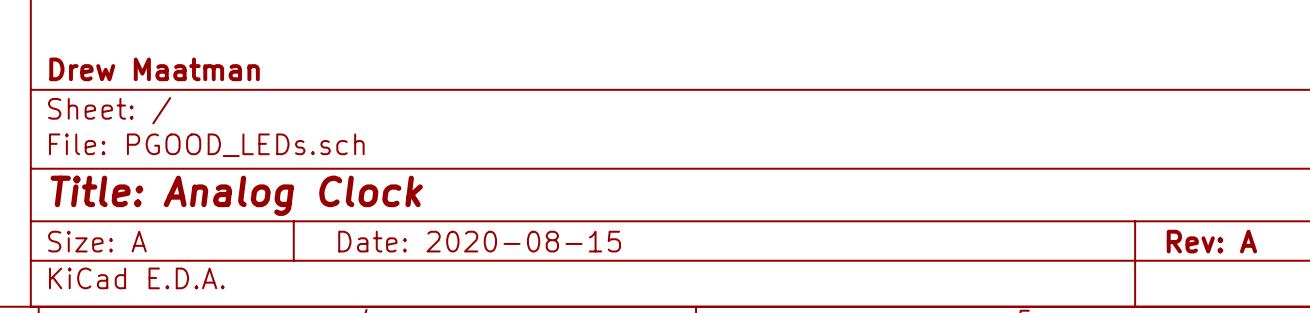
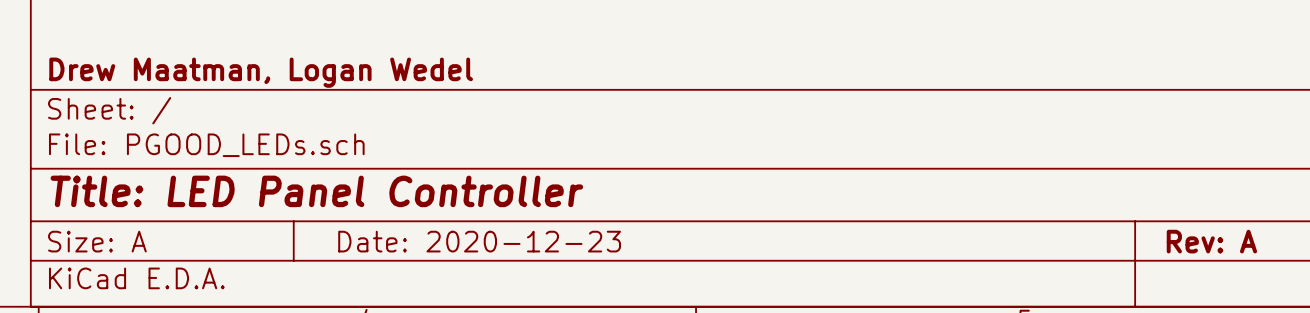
title block: Drew Maatman (154, 69) -> Drew Maatman, Logan Wedel (261, 72)
title block: Title: Analog Clock (236, 195) -> Title: LED Panel Controller (316, 191)
title block: Date: 2020-08-15 (479, 241) -> Date: 2020-12-23 (479, 241)

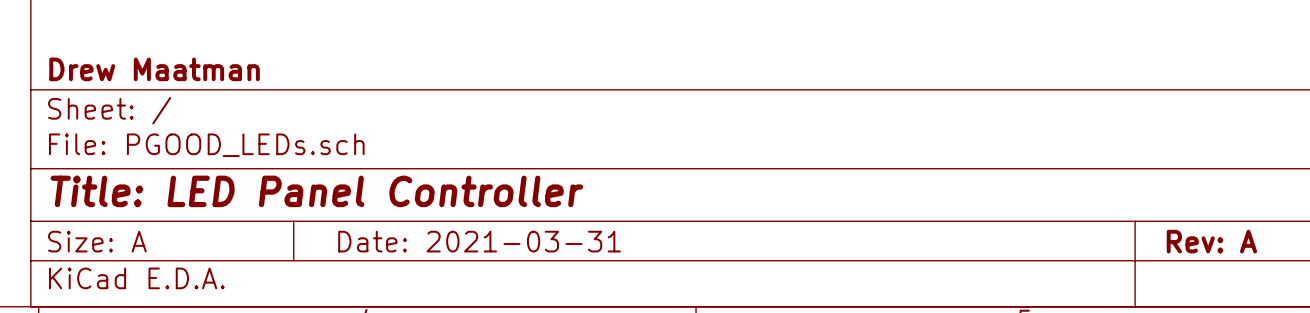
title block: Drew Maatman, Logan Wedel (261, 72) -> Drew Maatman (154, 69)
title block: Date: 2020-12-23 (479, 241) -> Date: 2021-03-31 (479, 241)

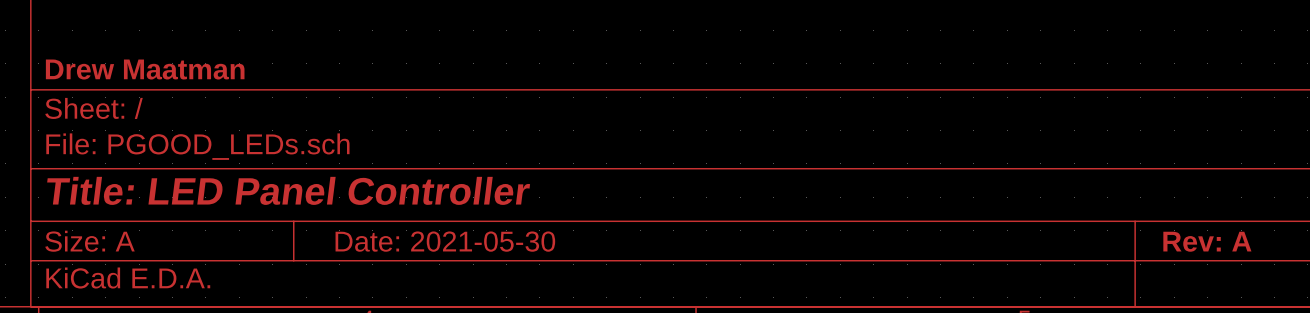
title block: Date: 2021-03-31 (479, 241) -> Date: 2021-05-30 (445, 241)

